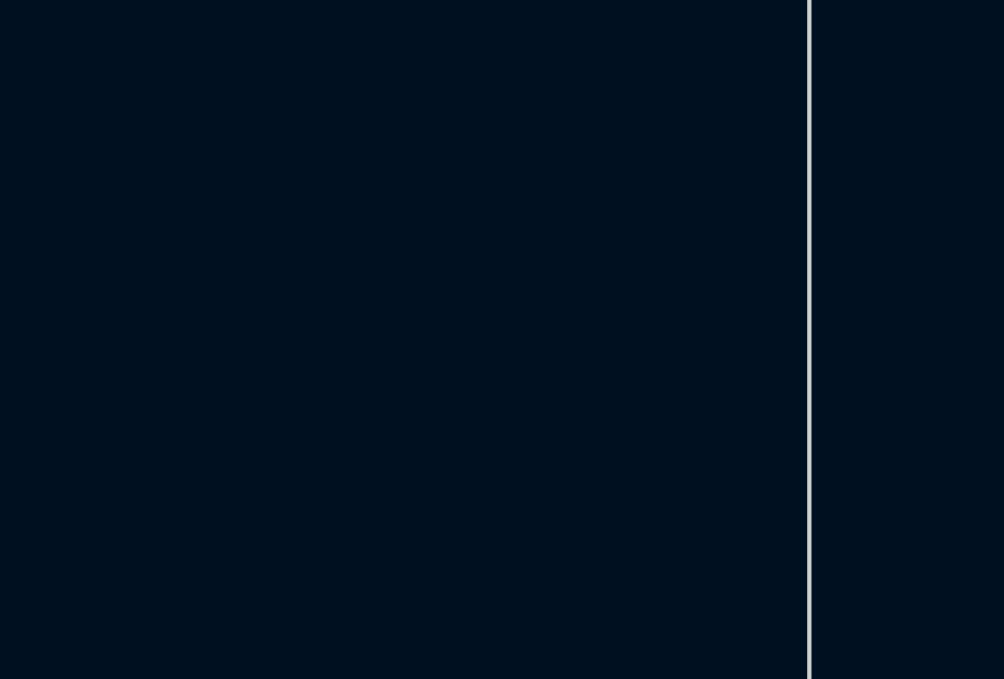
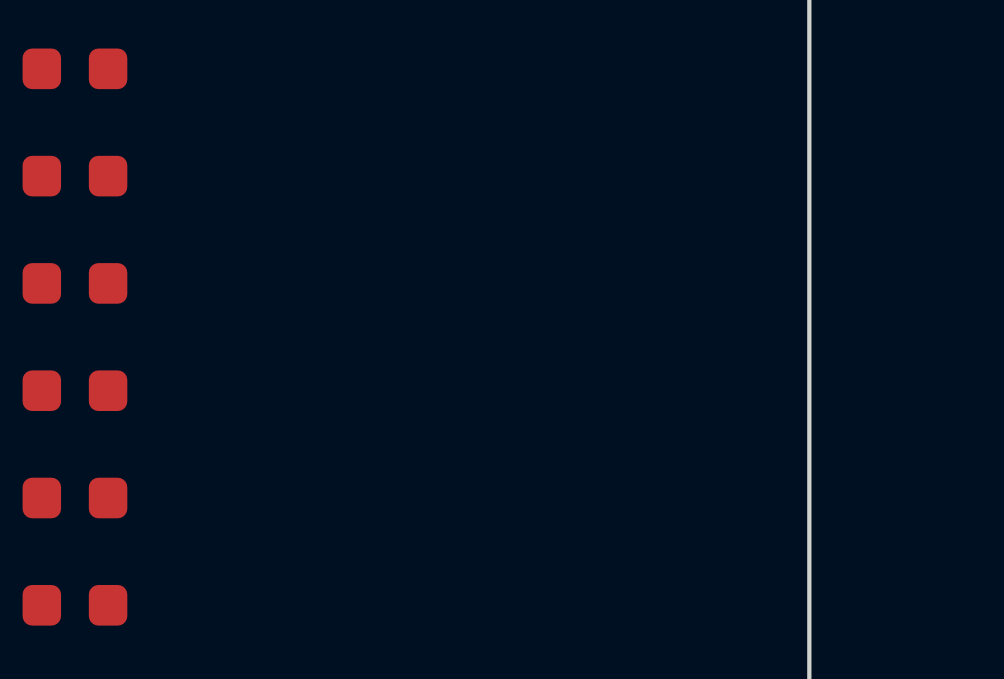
part: none -> (74, 68)
part: none -> (74, 176)
part: none -> (74, 283)
part: none -> (74, 390)
part: none -> (74, 498)
part: none -> (74, 605)

